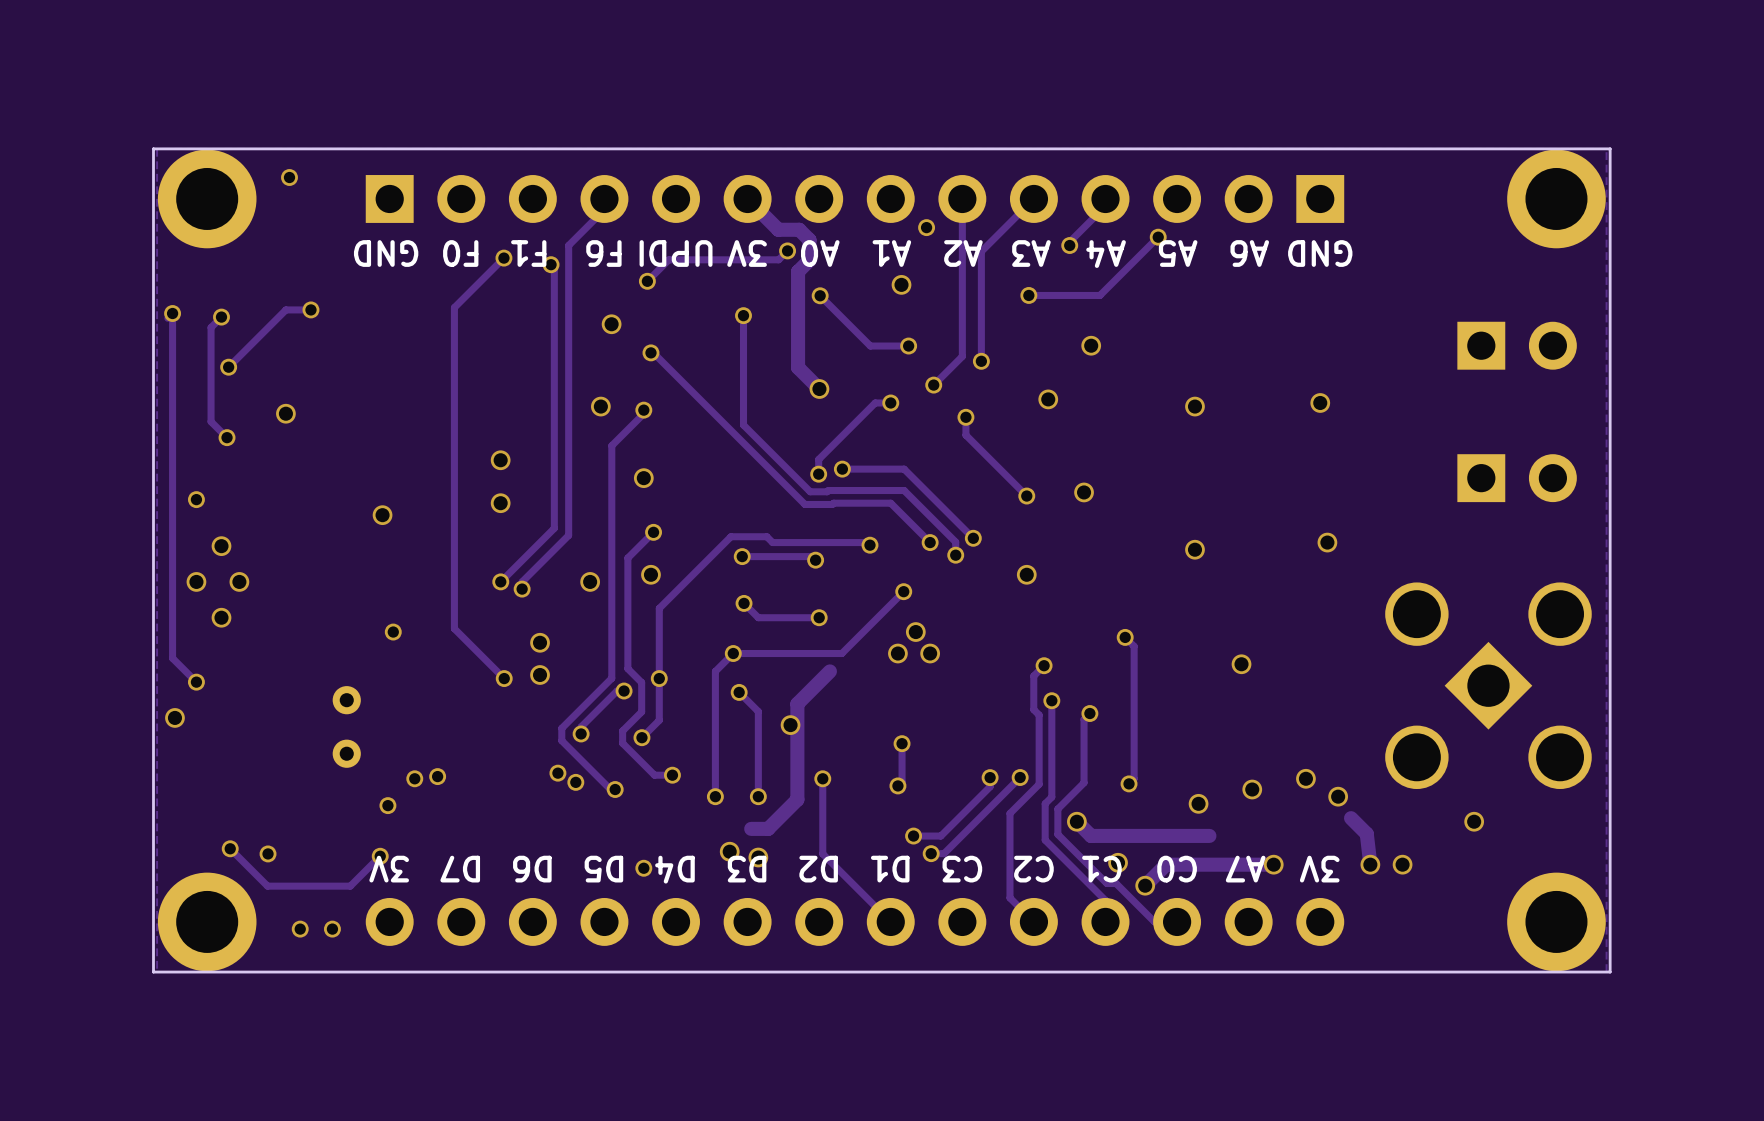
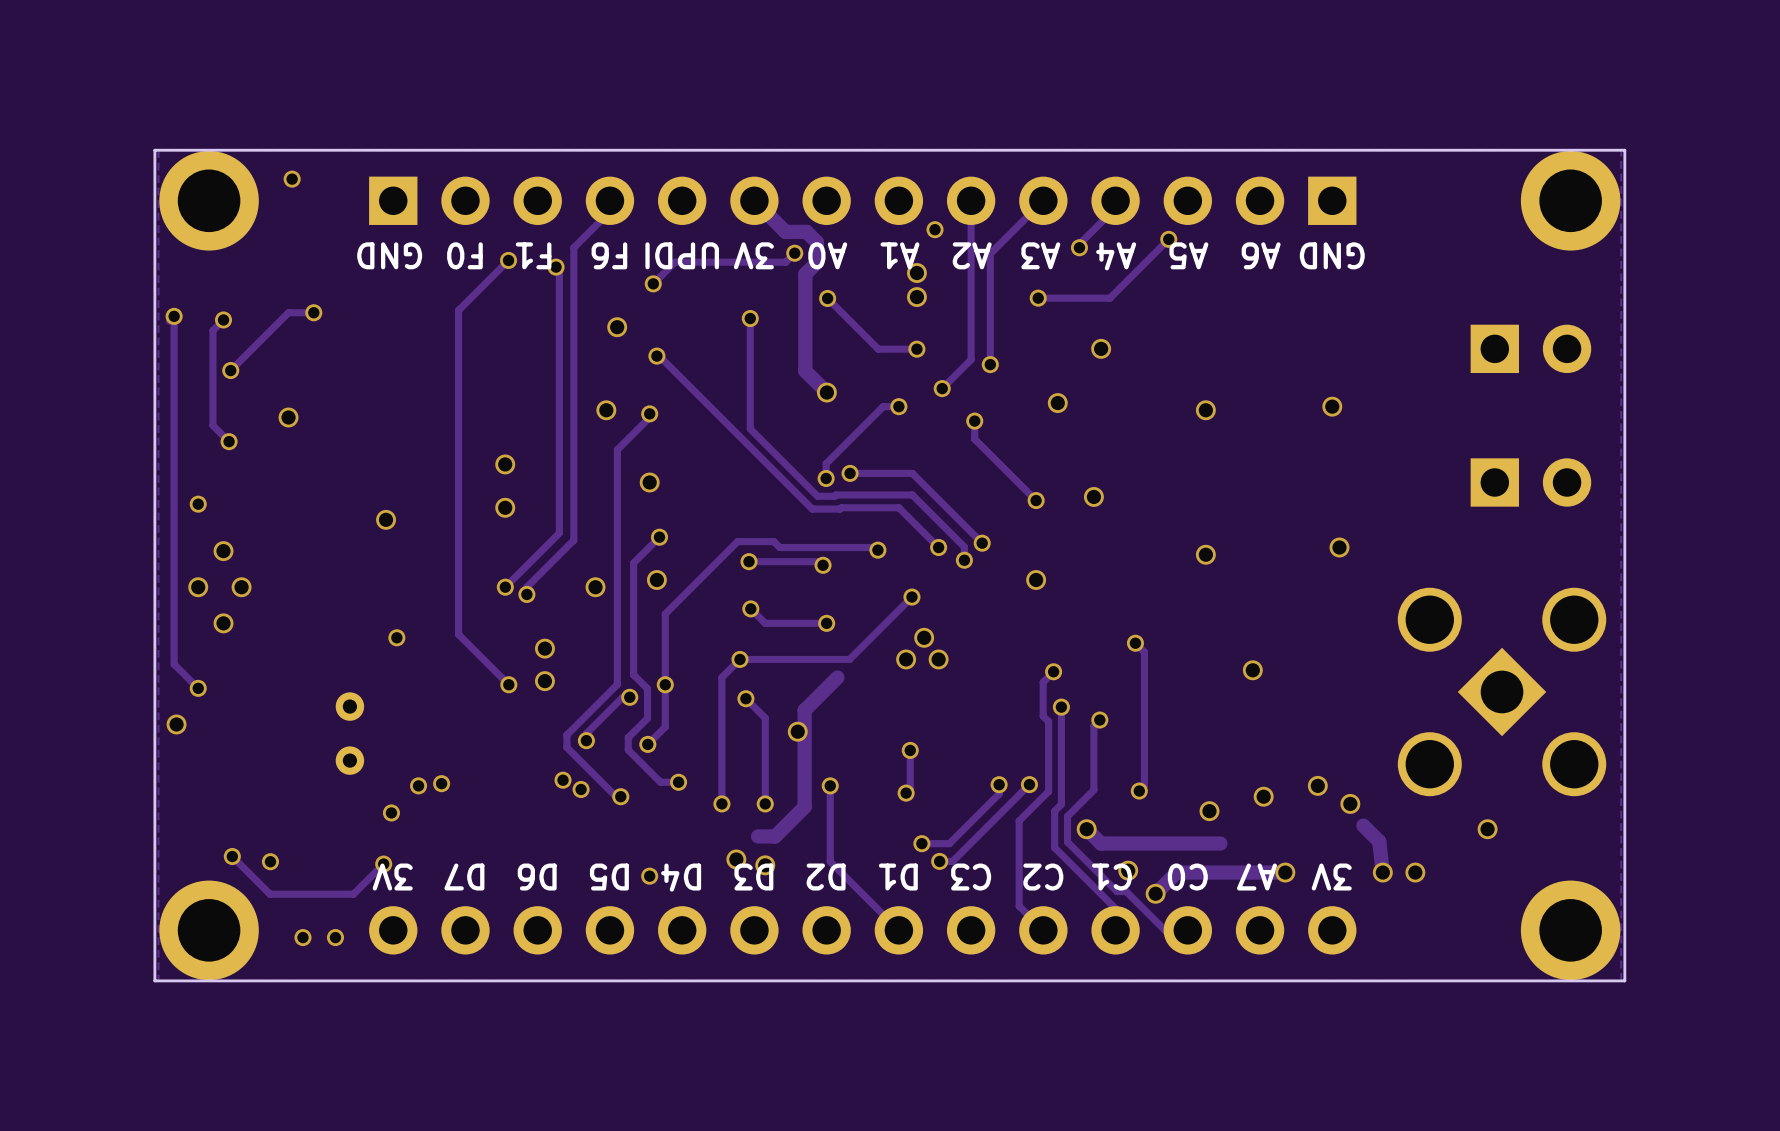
via: none -> (916, 273)
via: (901, 284) -> none
via: none -> (916, 297)

